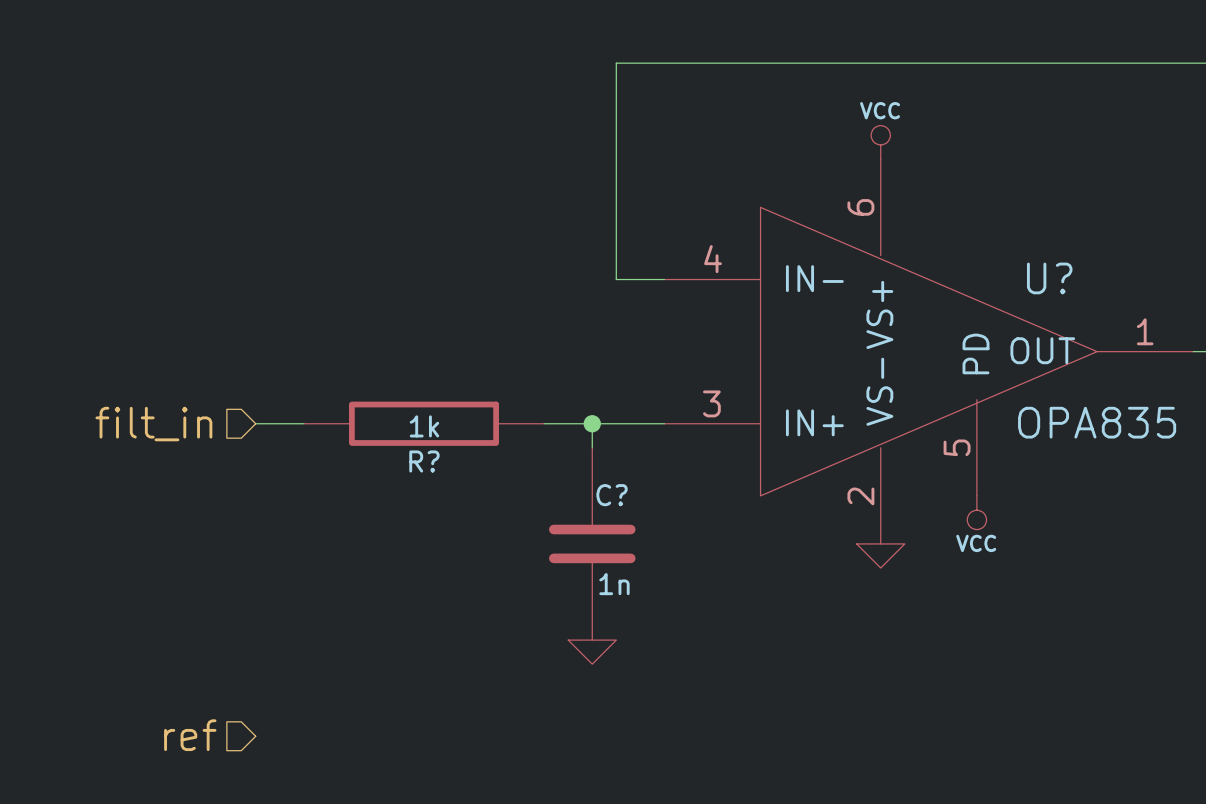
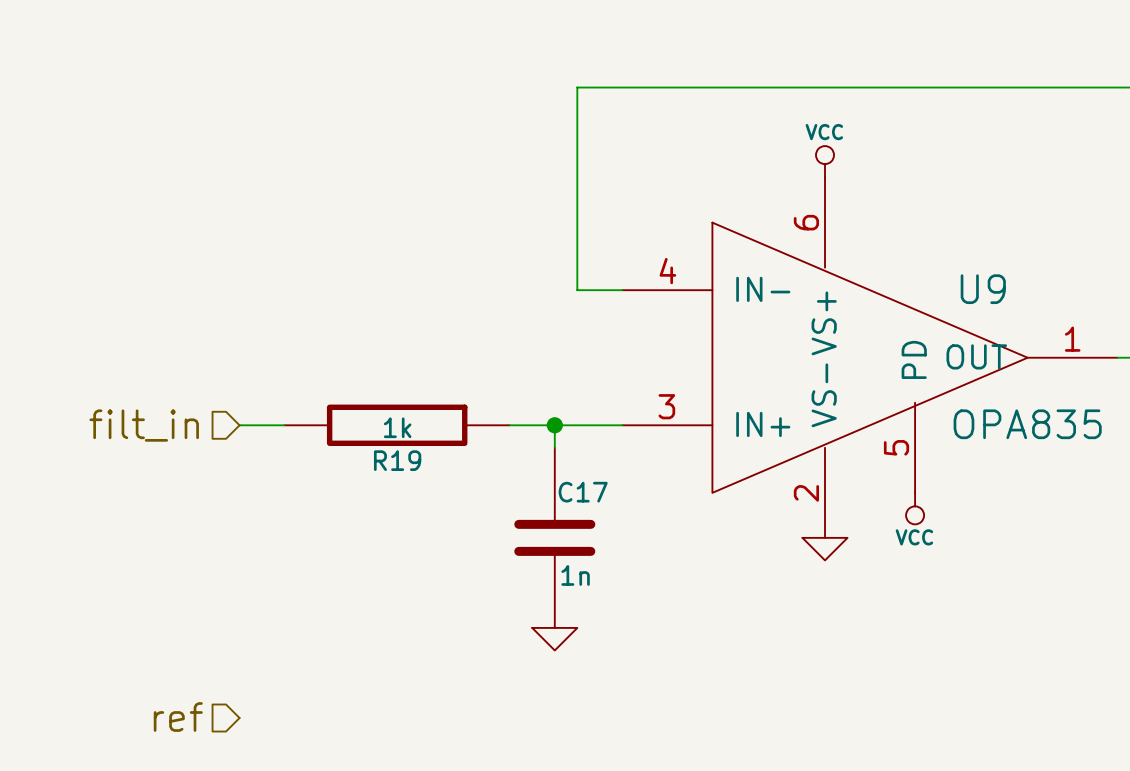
U? name: U? (1049, 278) -> U9 (983, 289)
R? name: R? (424, 461) -> R19 (397, 460)
C? name: C? (612, 495) -> C17 (583, 492)

